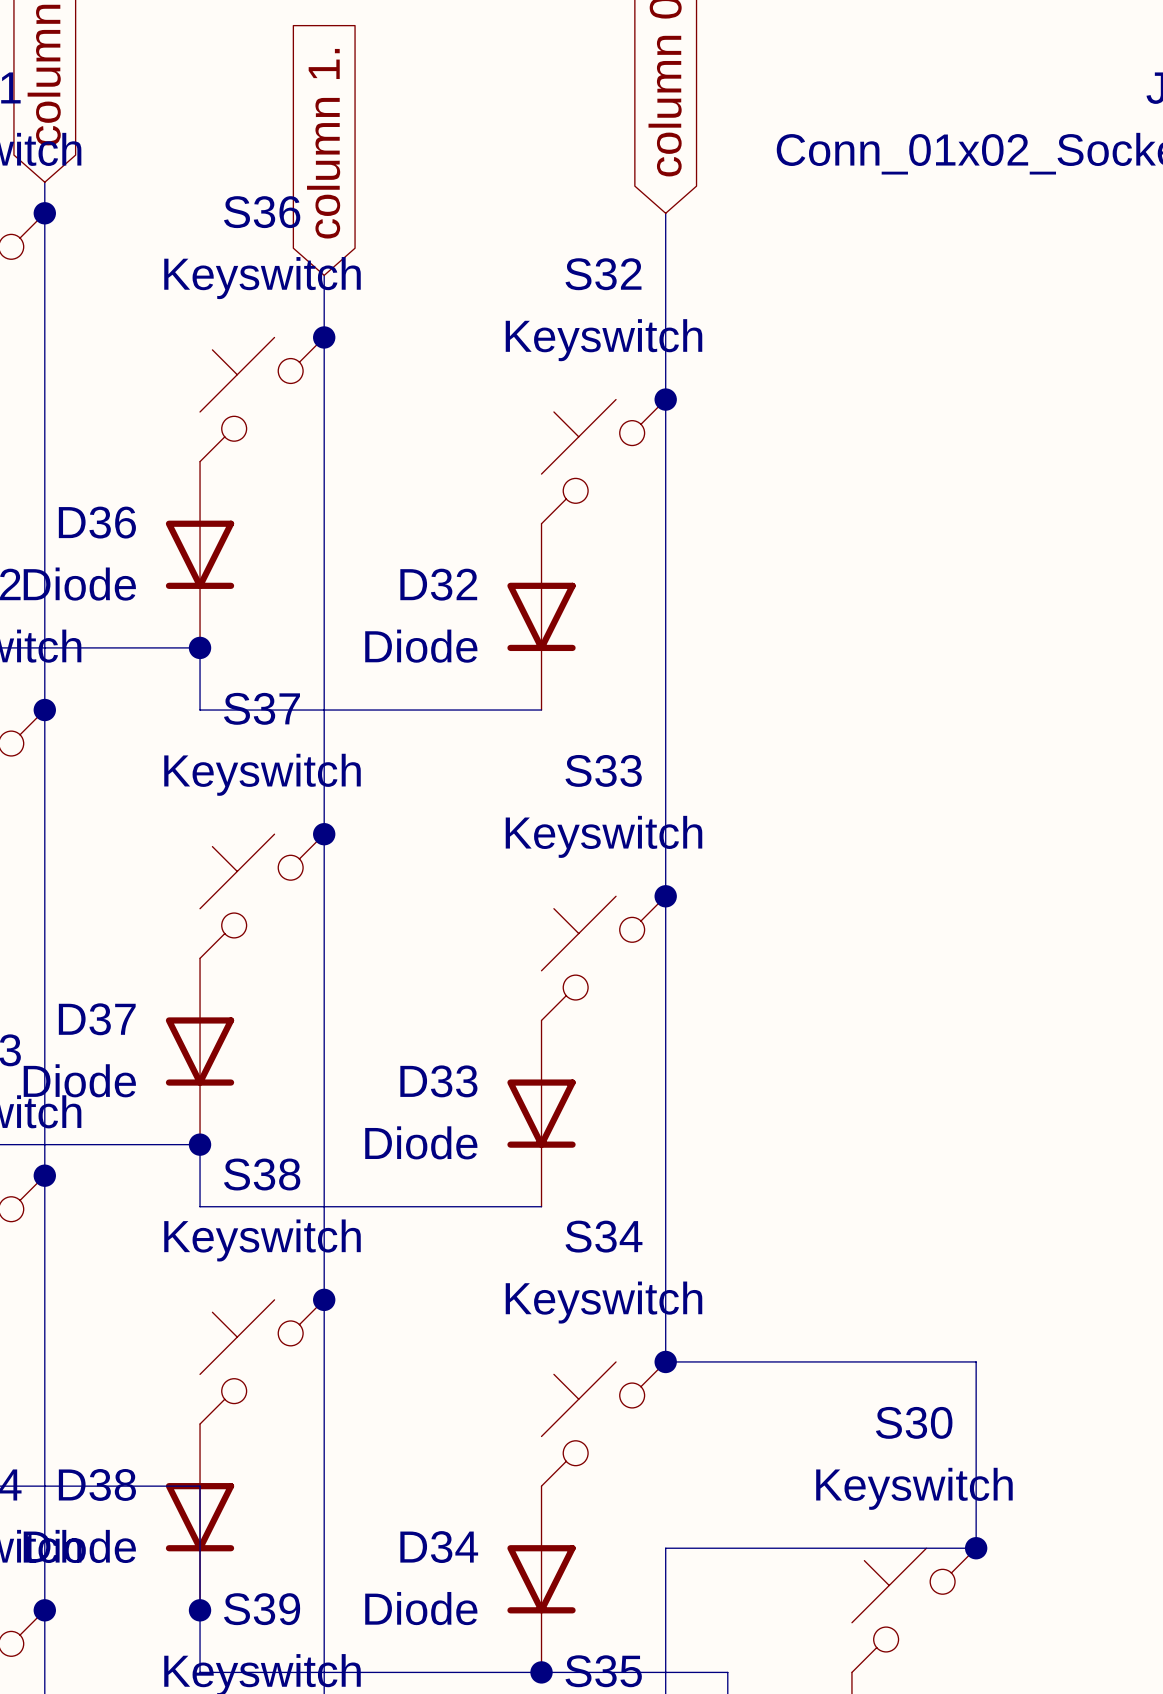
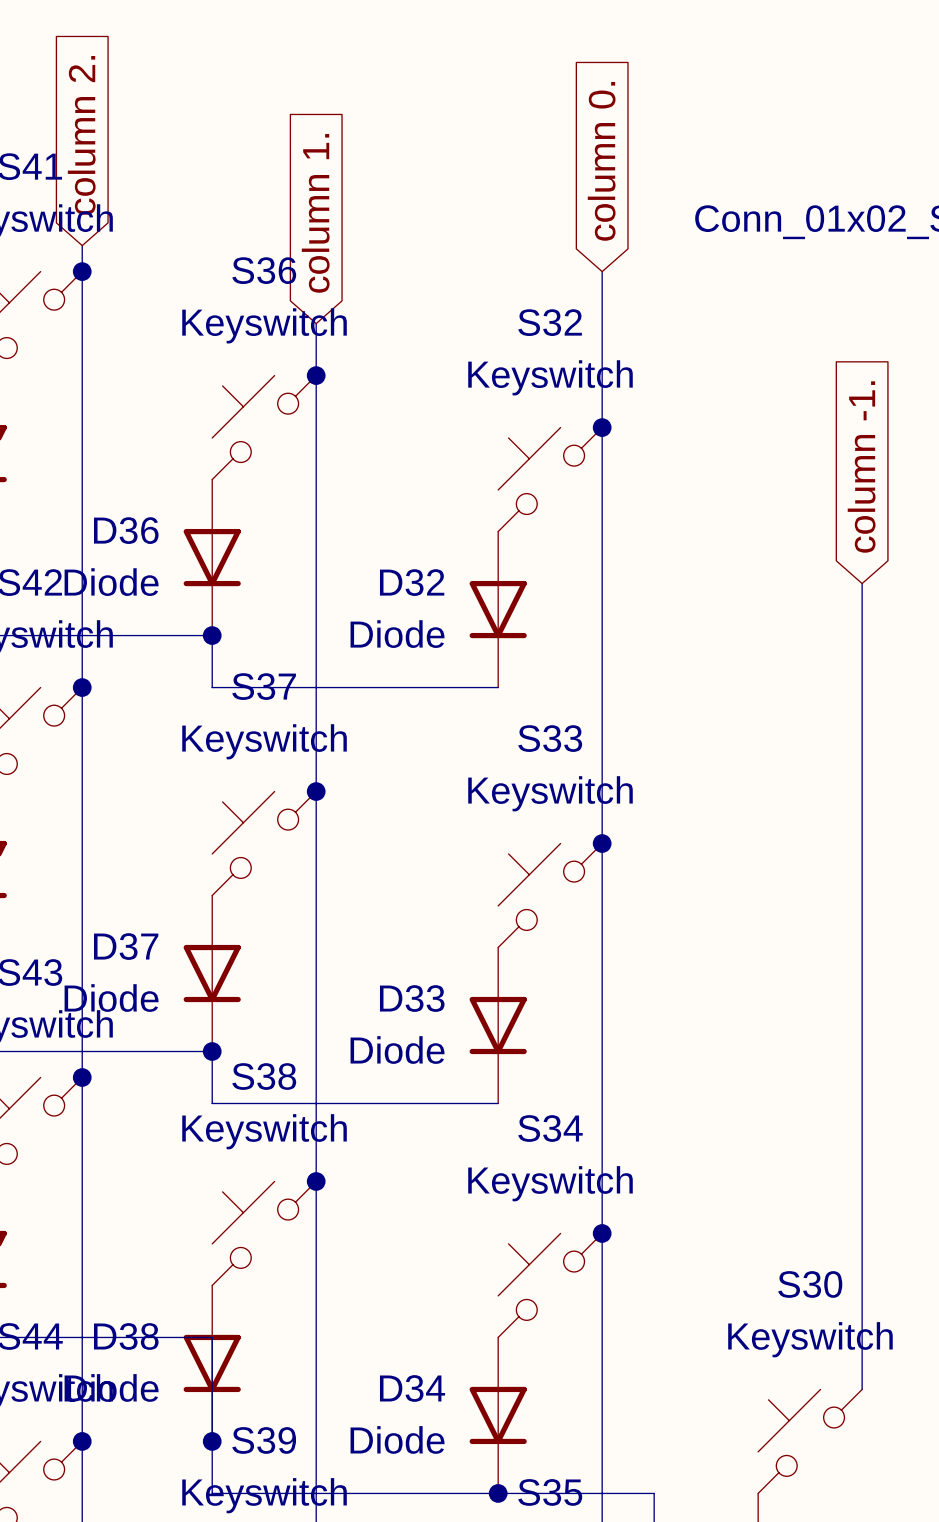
global label: none -> column -1. (861, 467)
wire: none -> (862, 583) (862, 1233)
wire: (665, 1361) (976, 1361) -> (602, 1233) (602, 1389)
wire: (665, 1548) (976, 1548) -> none
junction: (976, 1548) -> none

